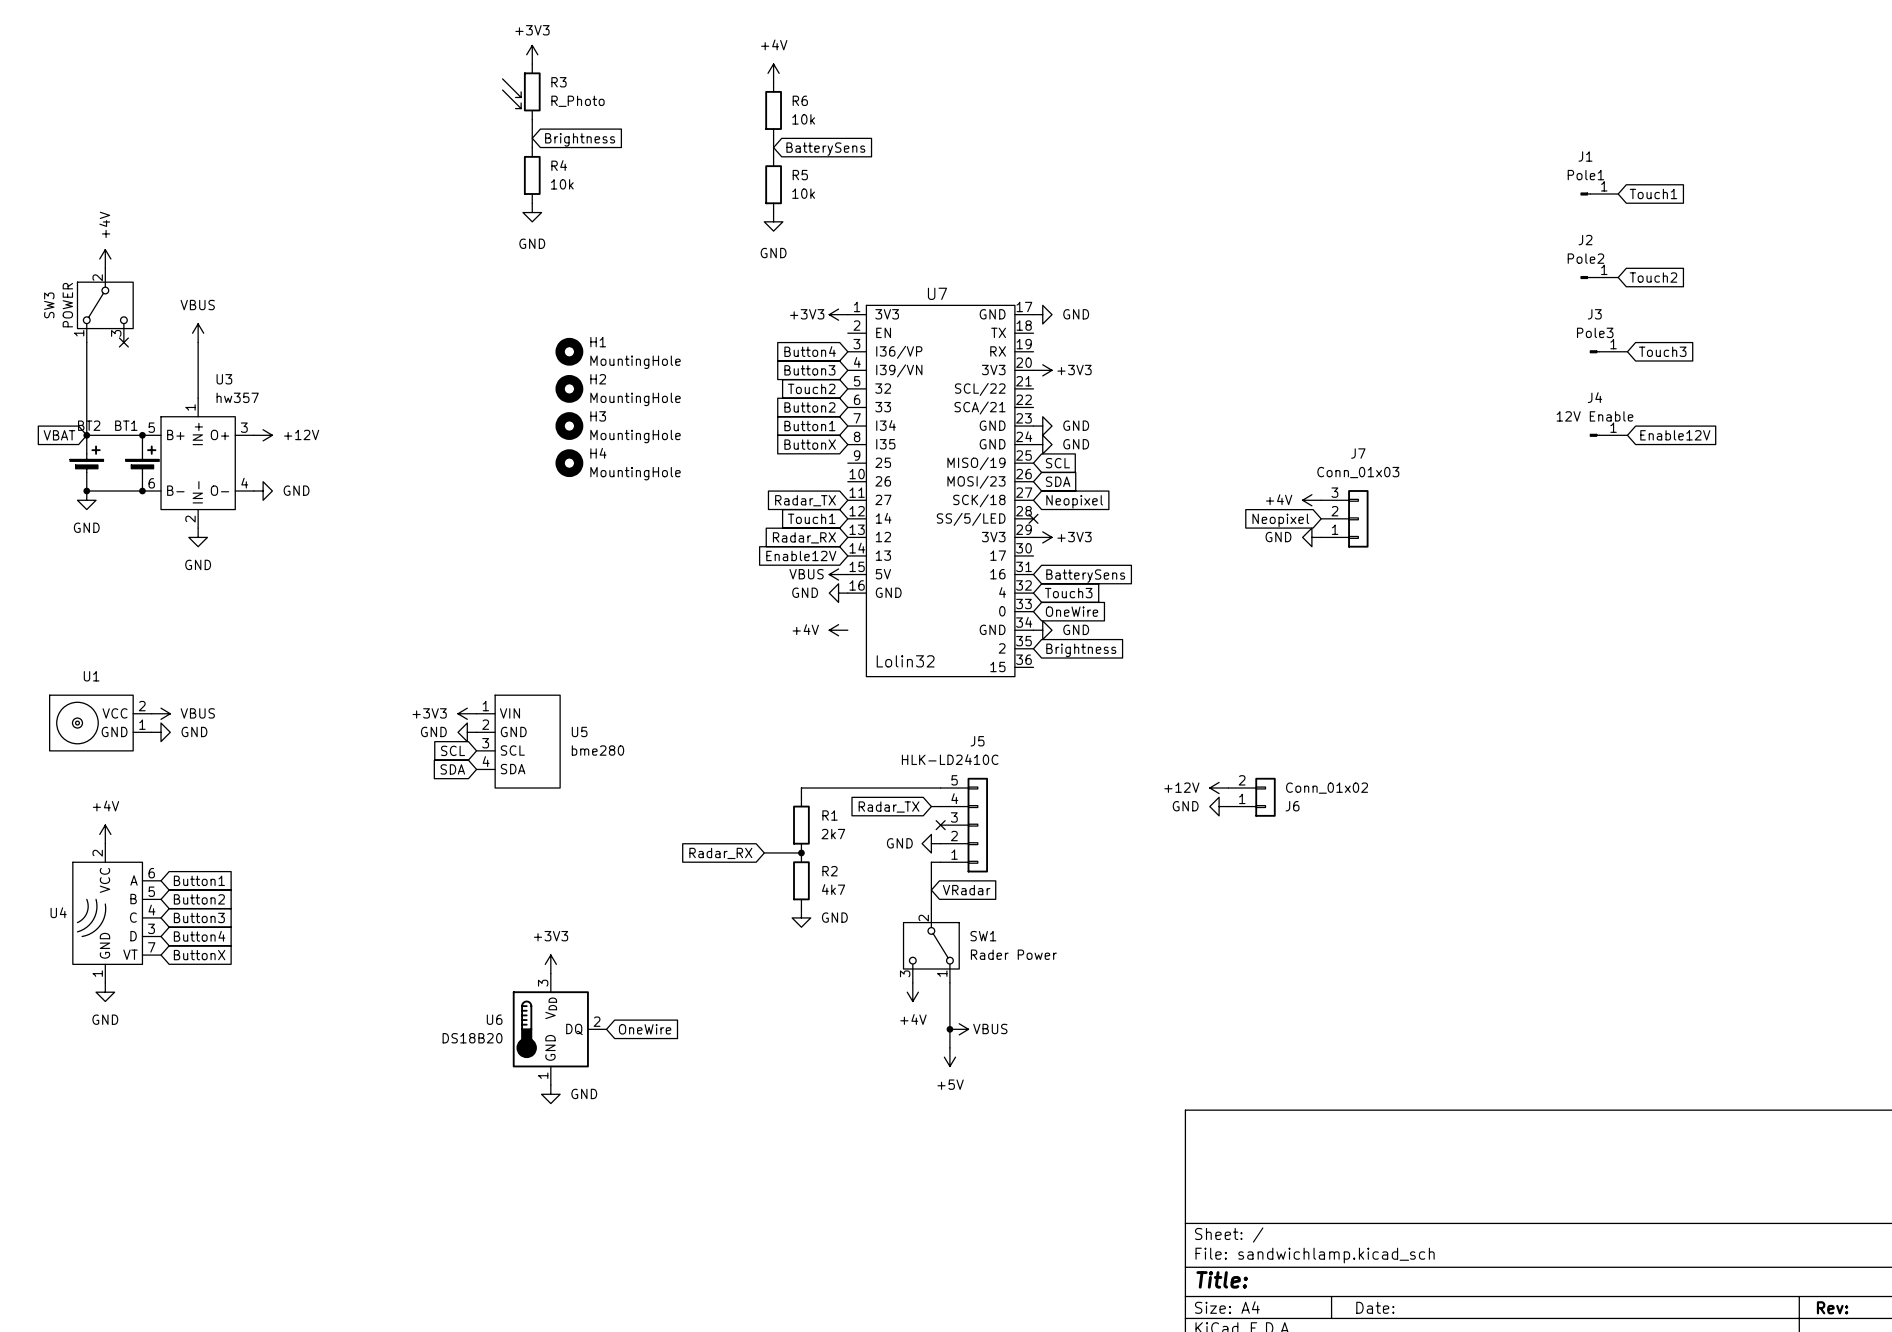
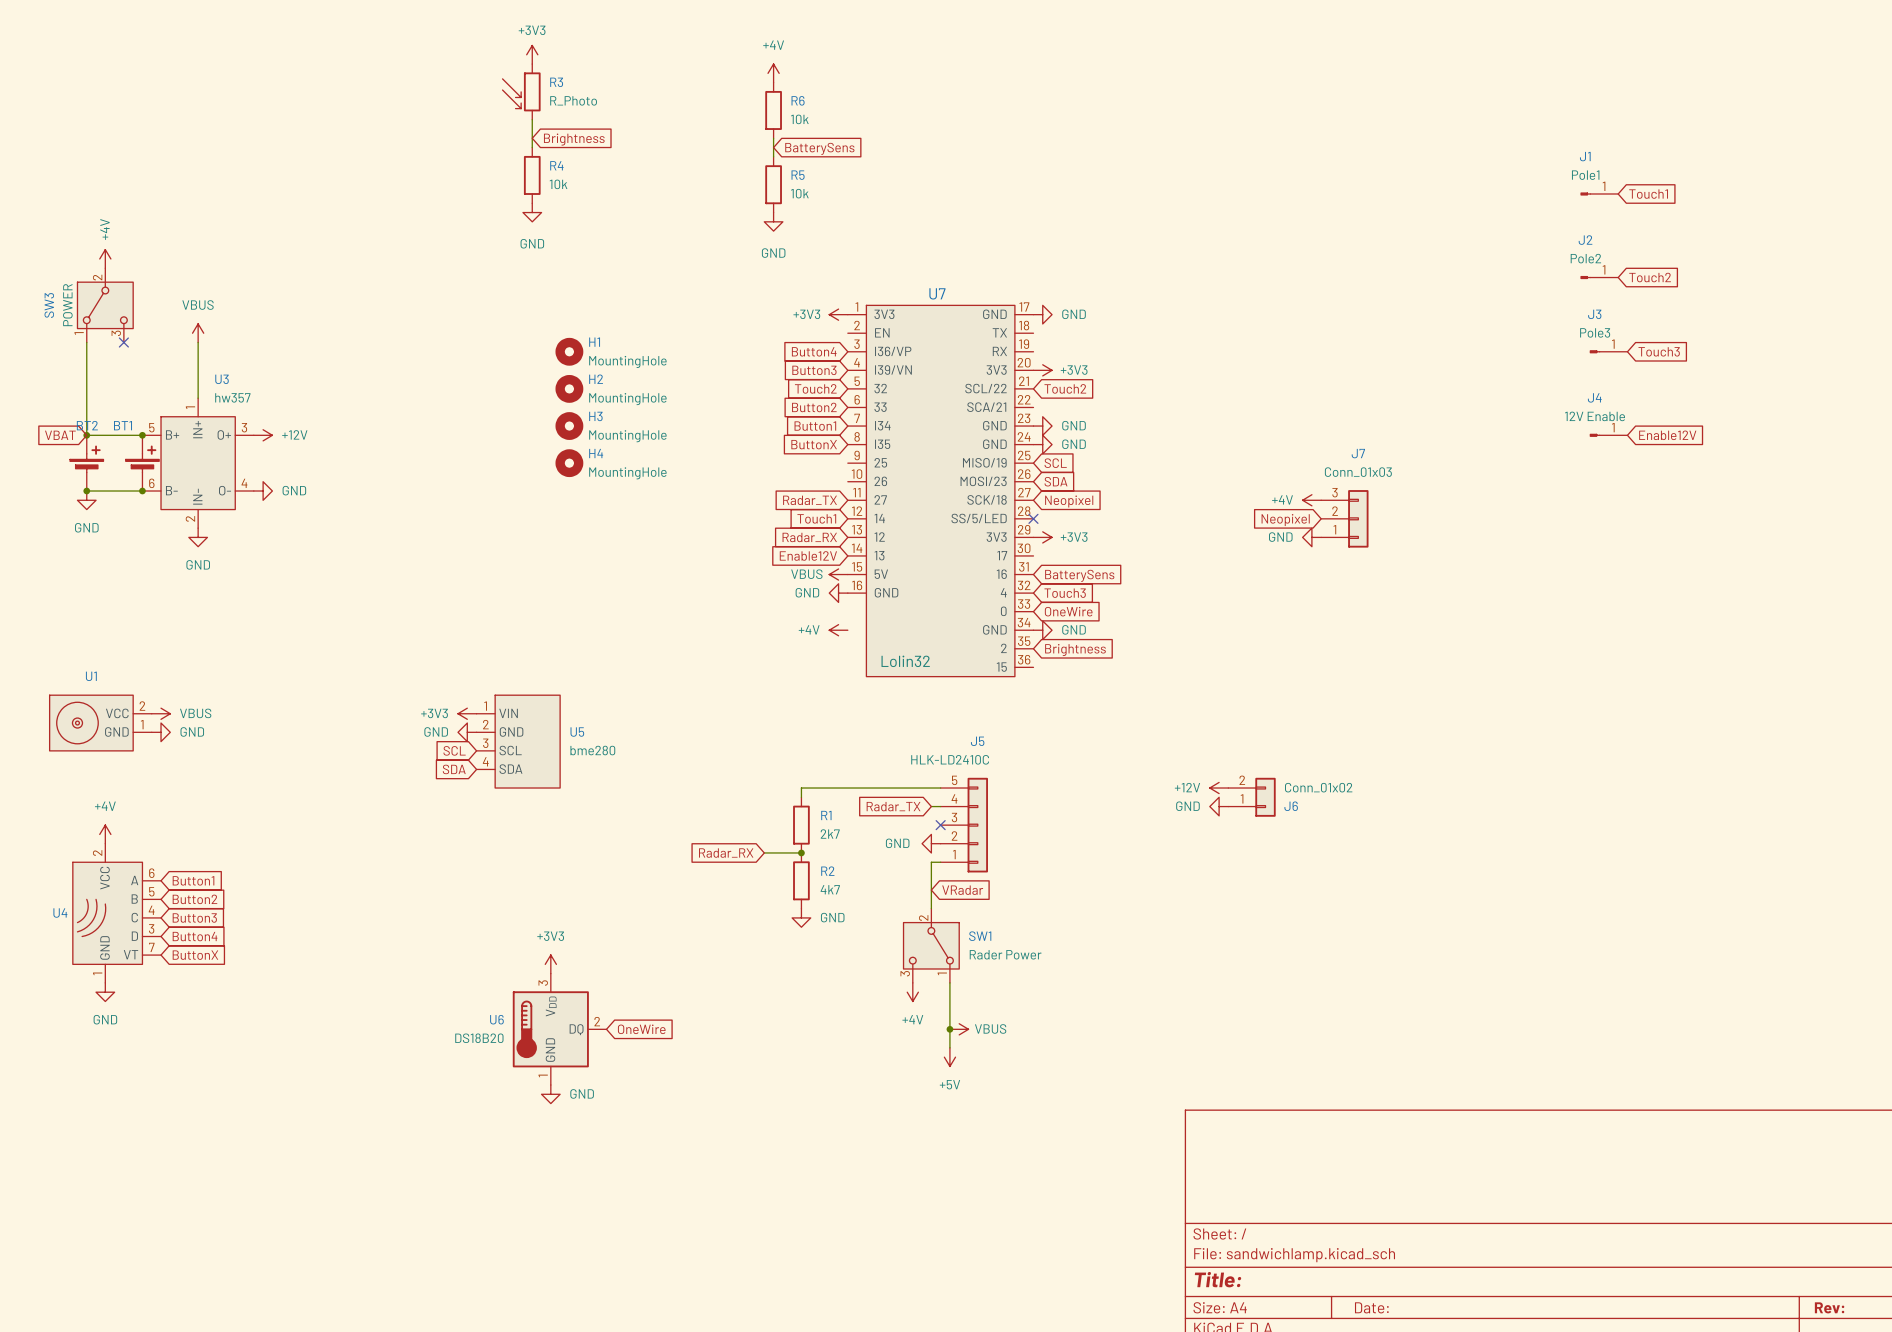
global label: none -> Touch2 (1065, 388)

